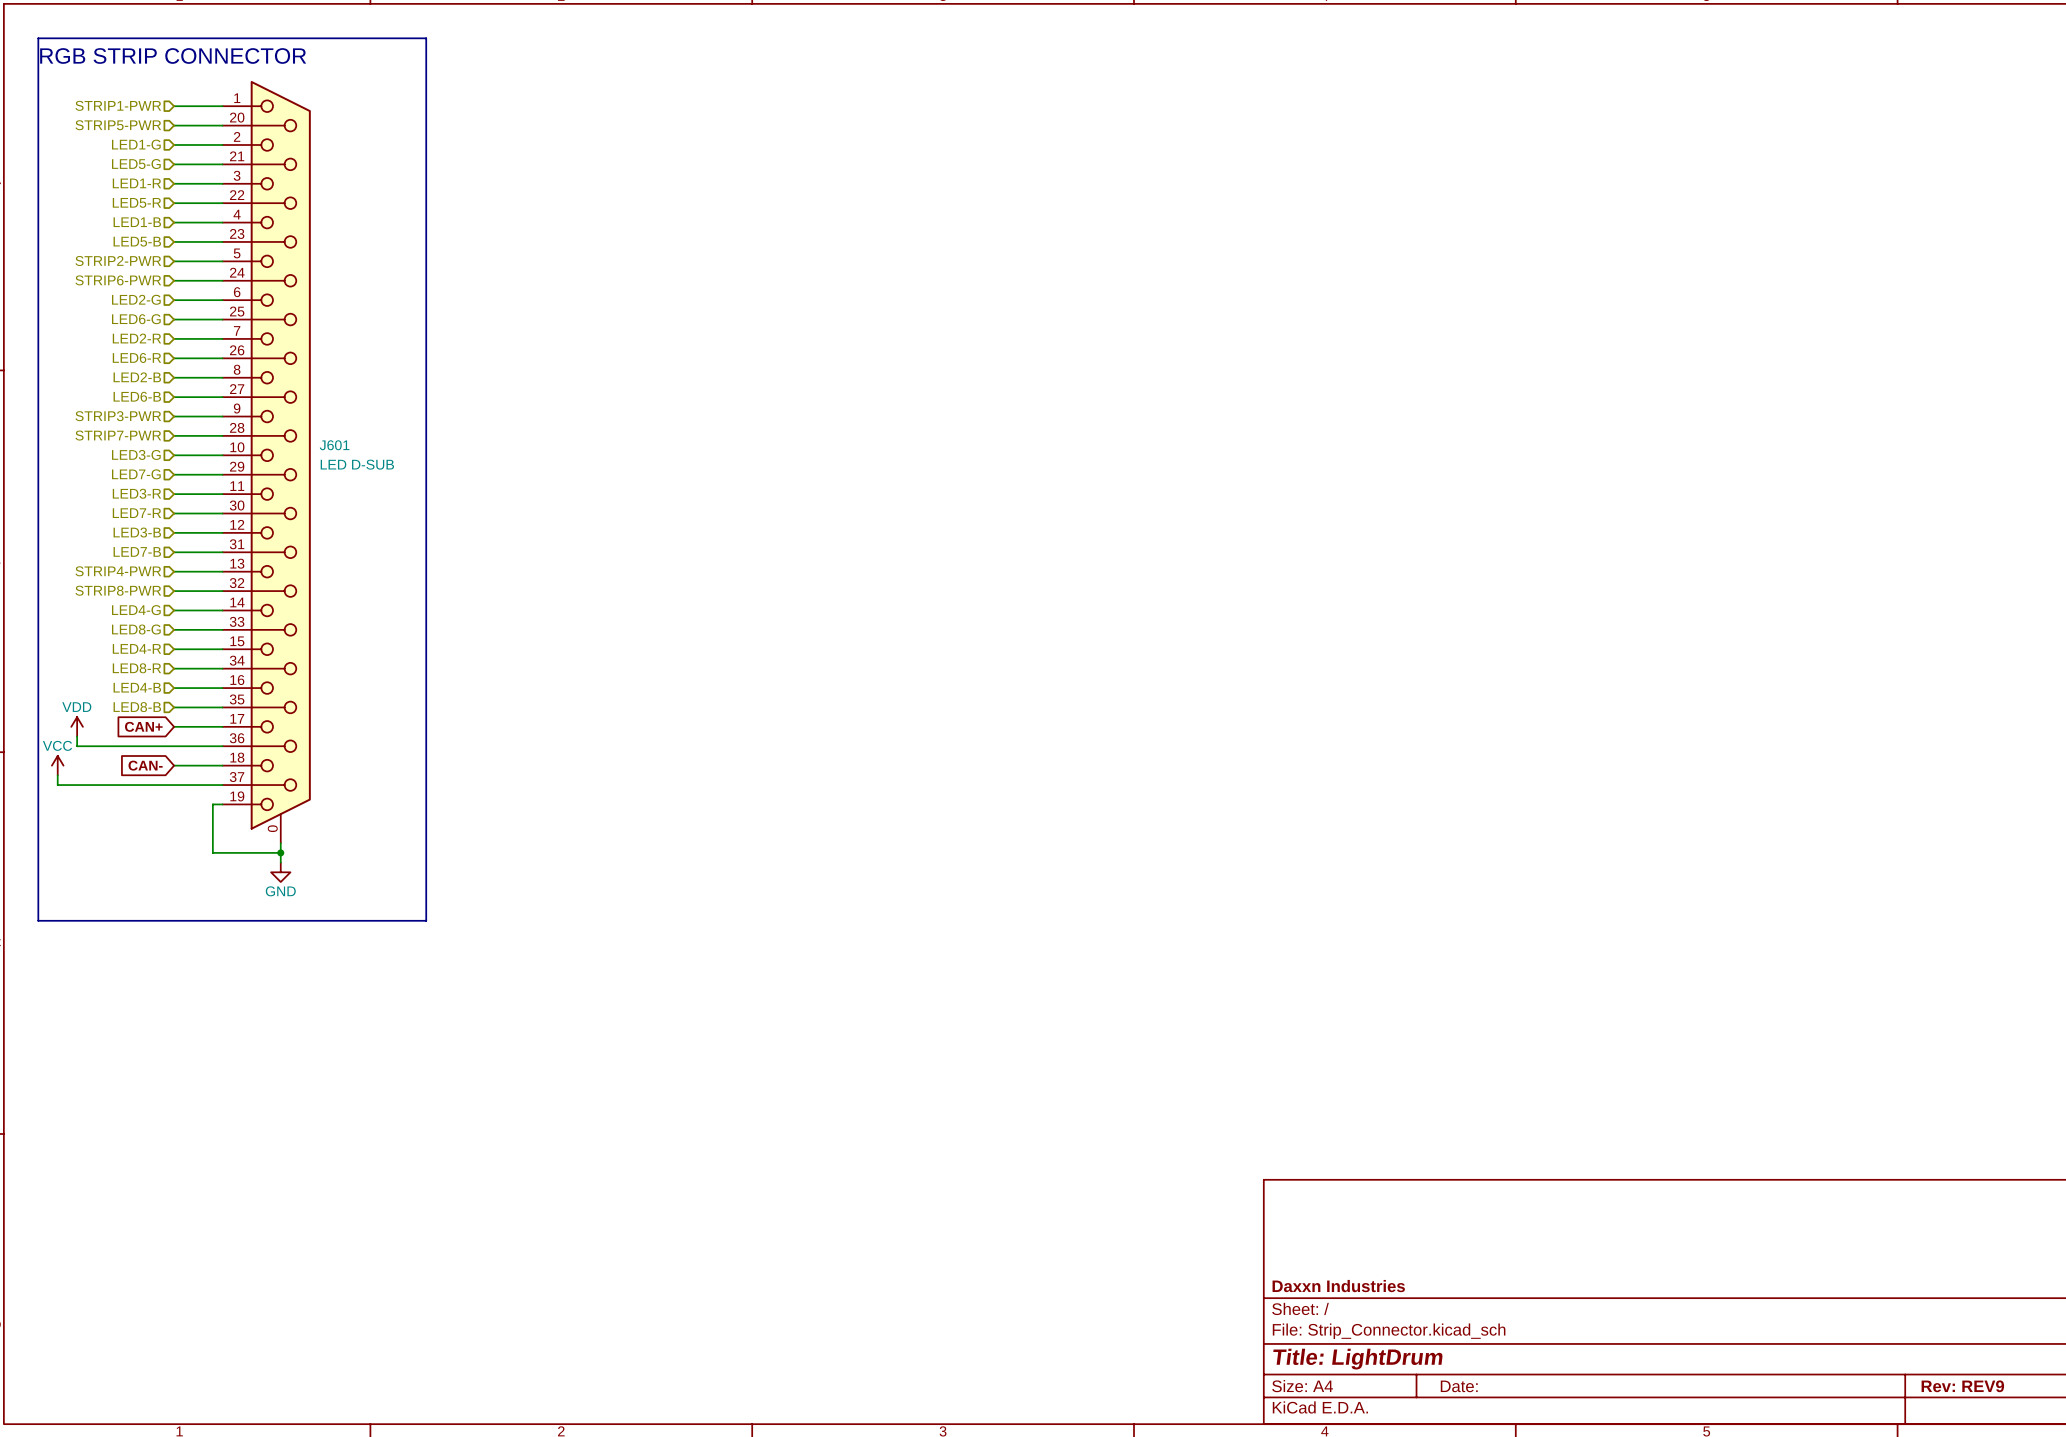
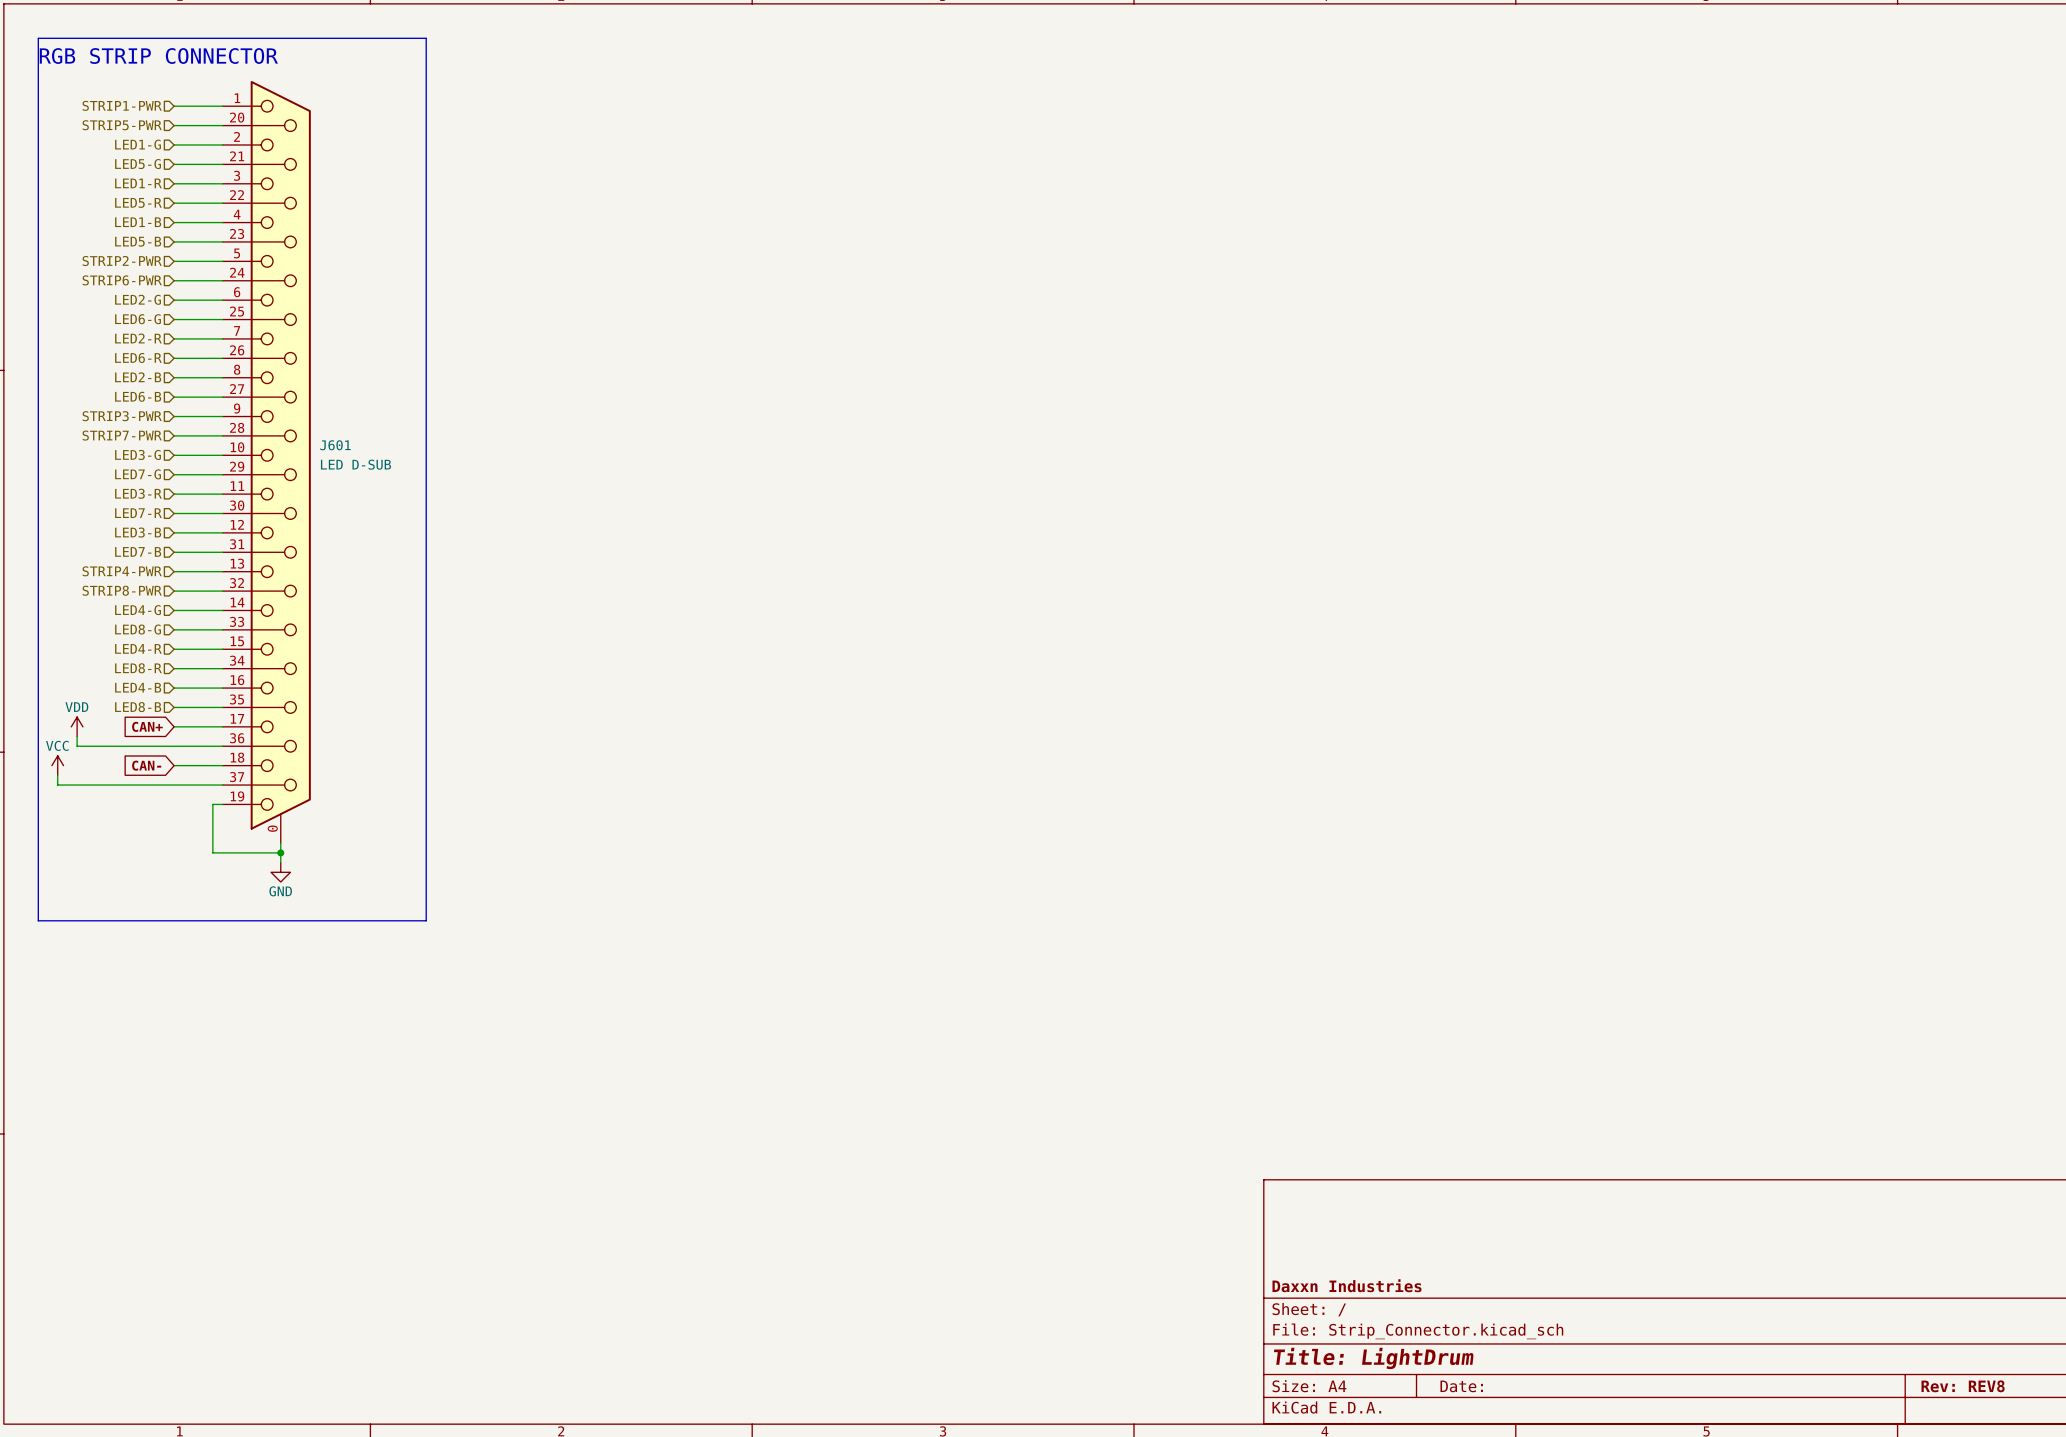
title block: Rev: REV9 (1962, 1386) -> Rev: REV8 (1963, 1386)

